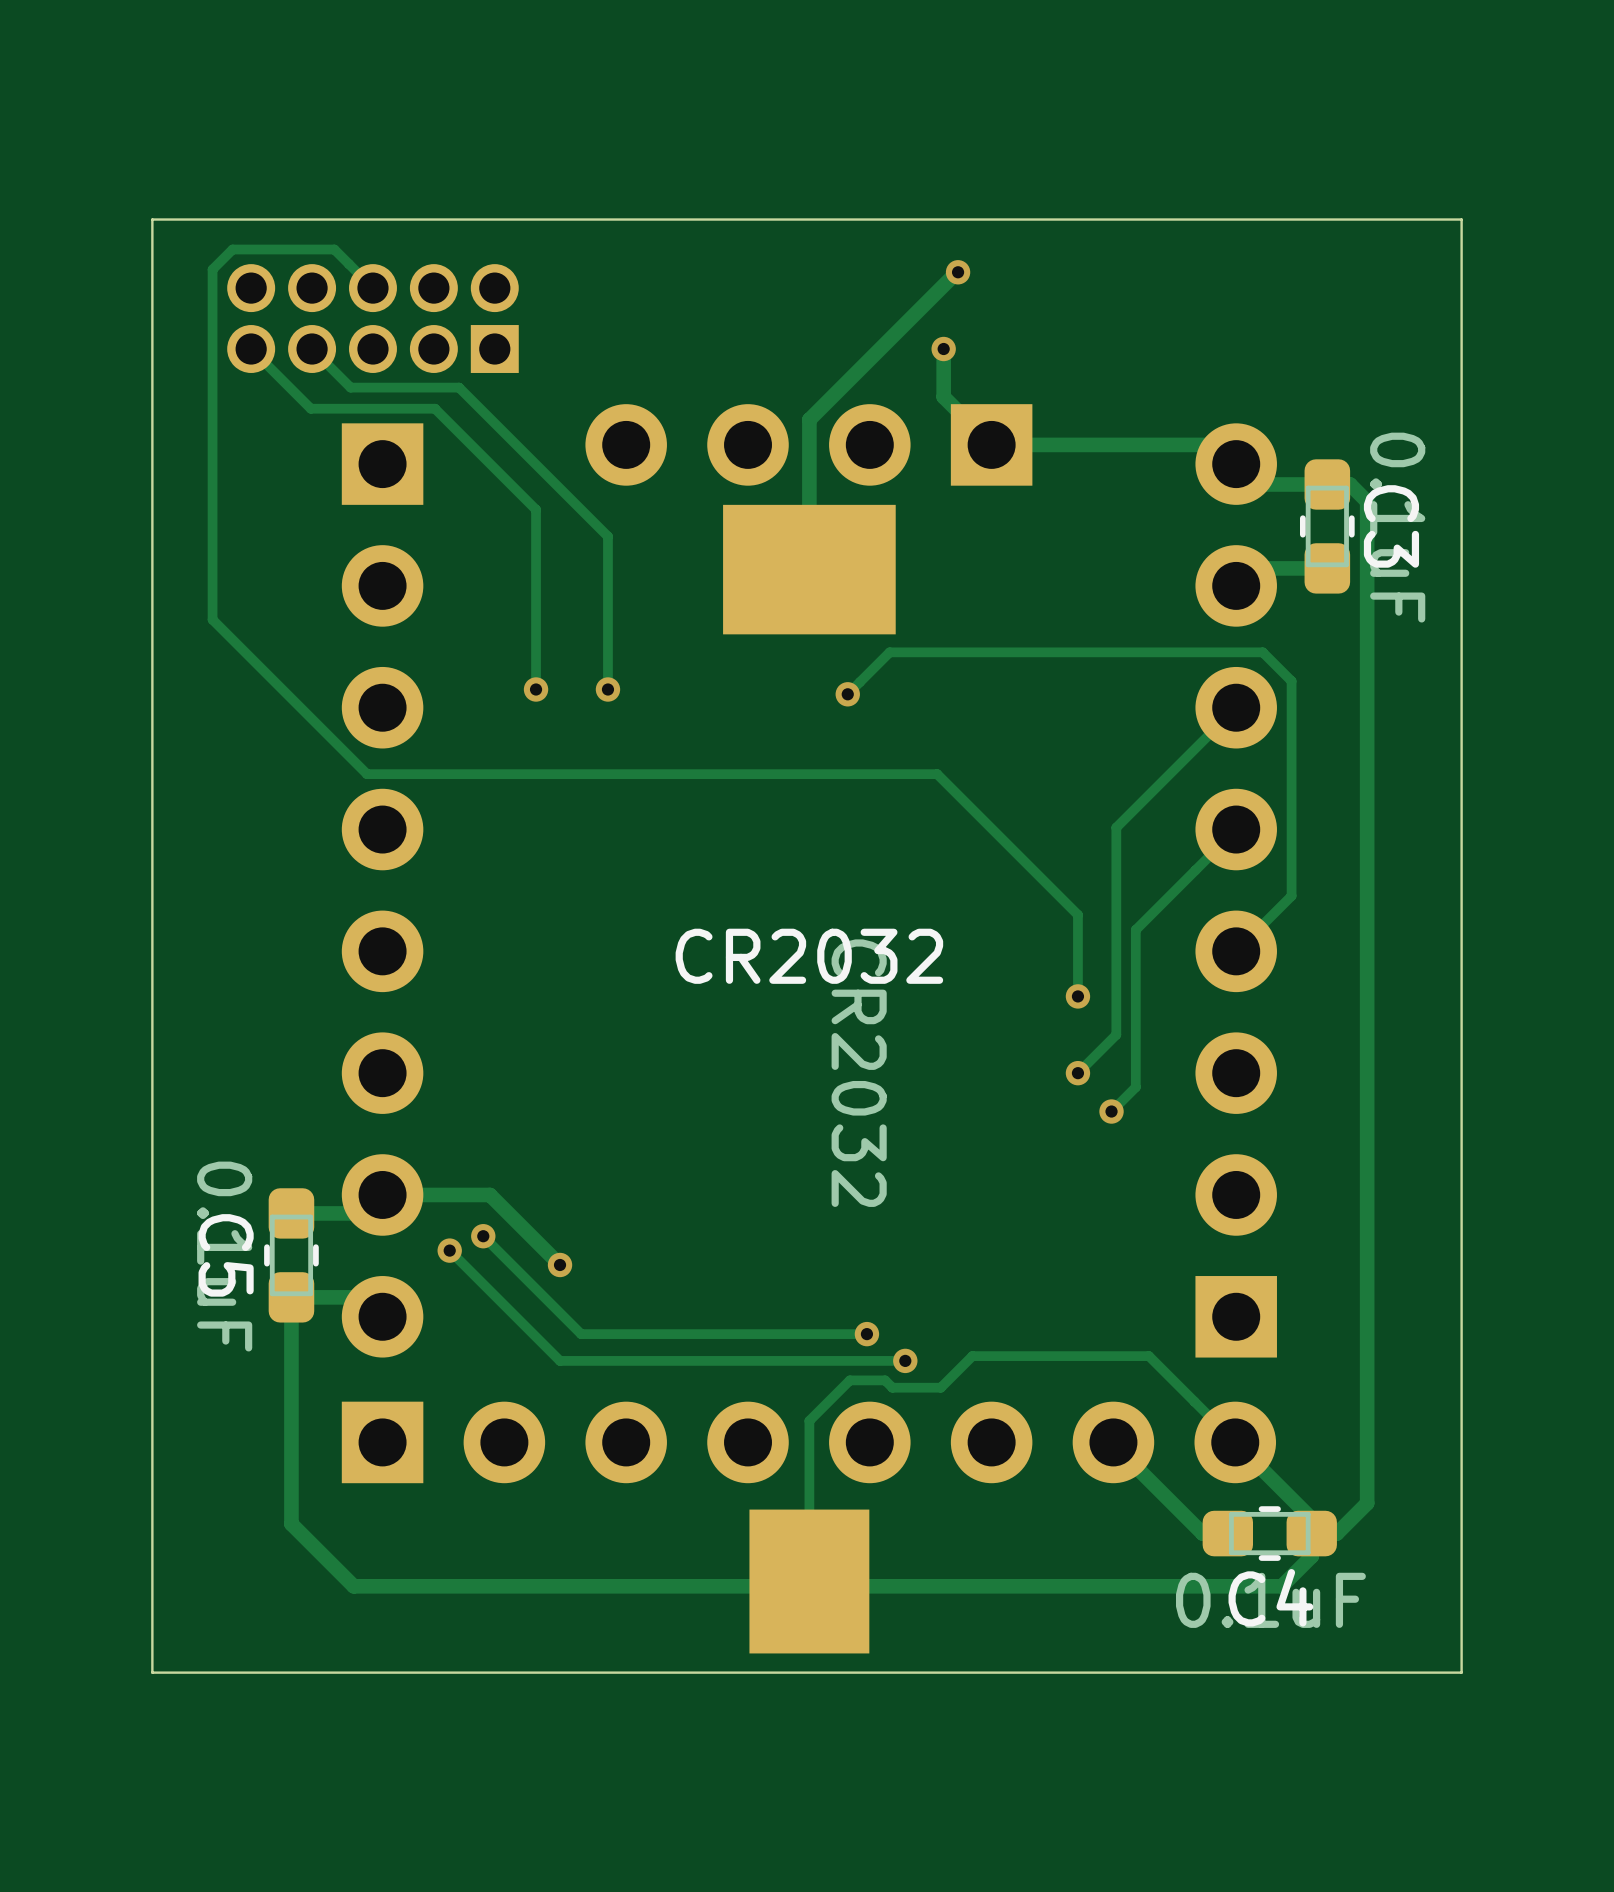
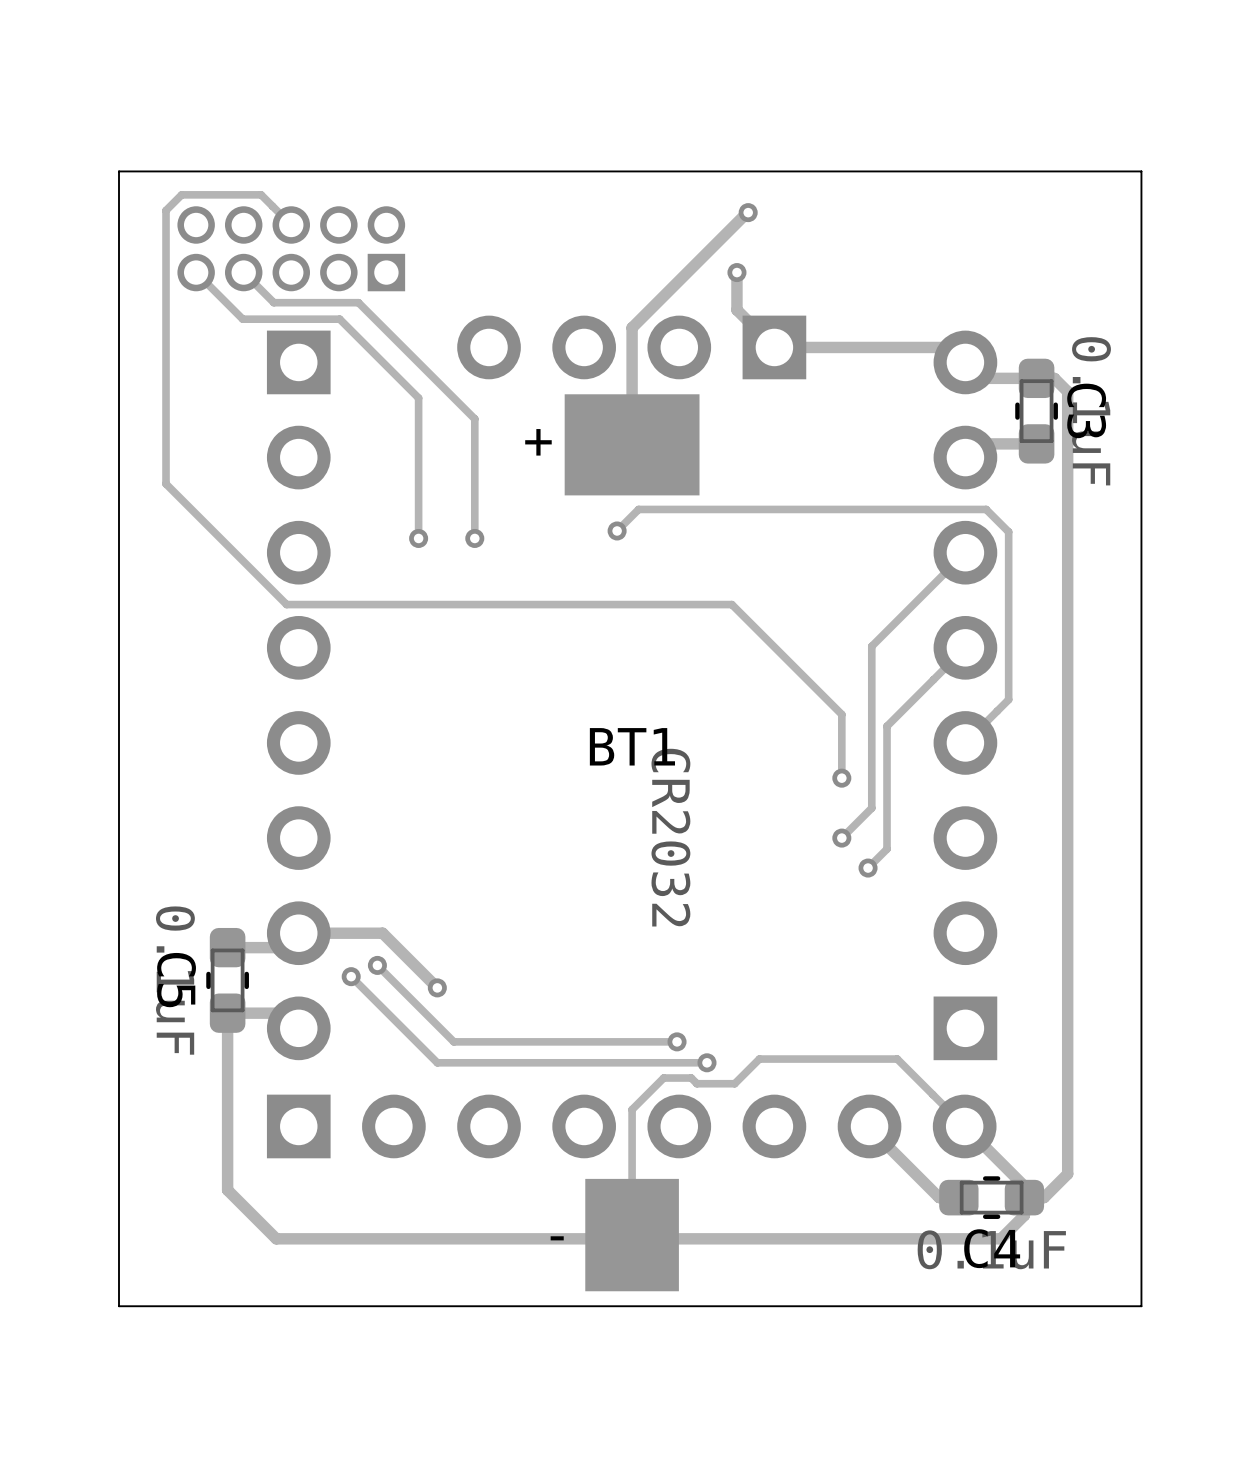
text: none -> + (538, 442)
track: (889, 652) (847, 694) -> (694, 509) (638, 509) (617, 530)
via position: (847, 694) -> (617, 530)
CR2032 name: CR2032 (809, 956) -> BT1 (632, 746)
text: none -> - (557, 1238)

